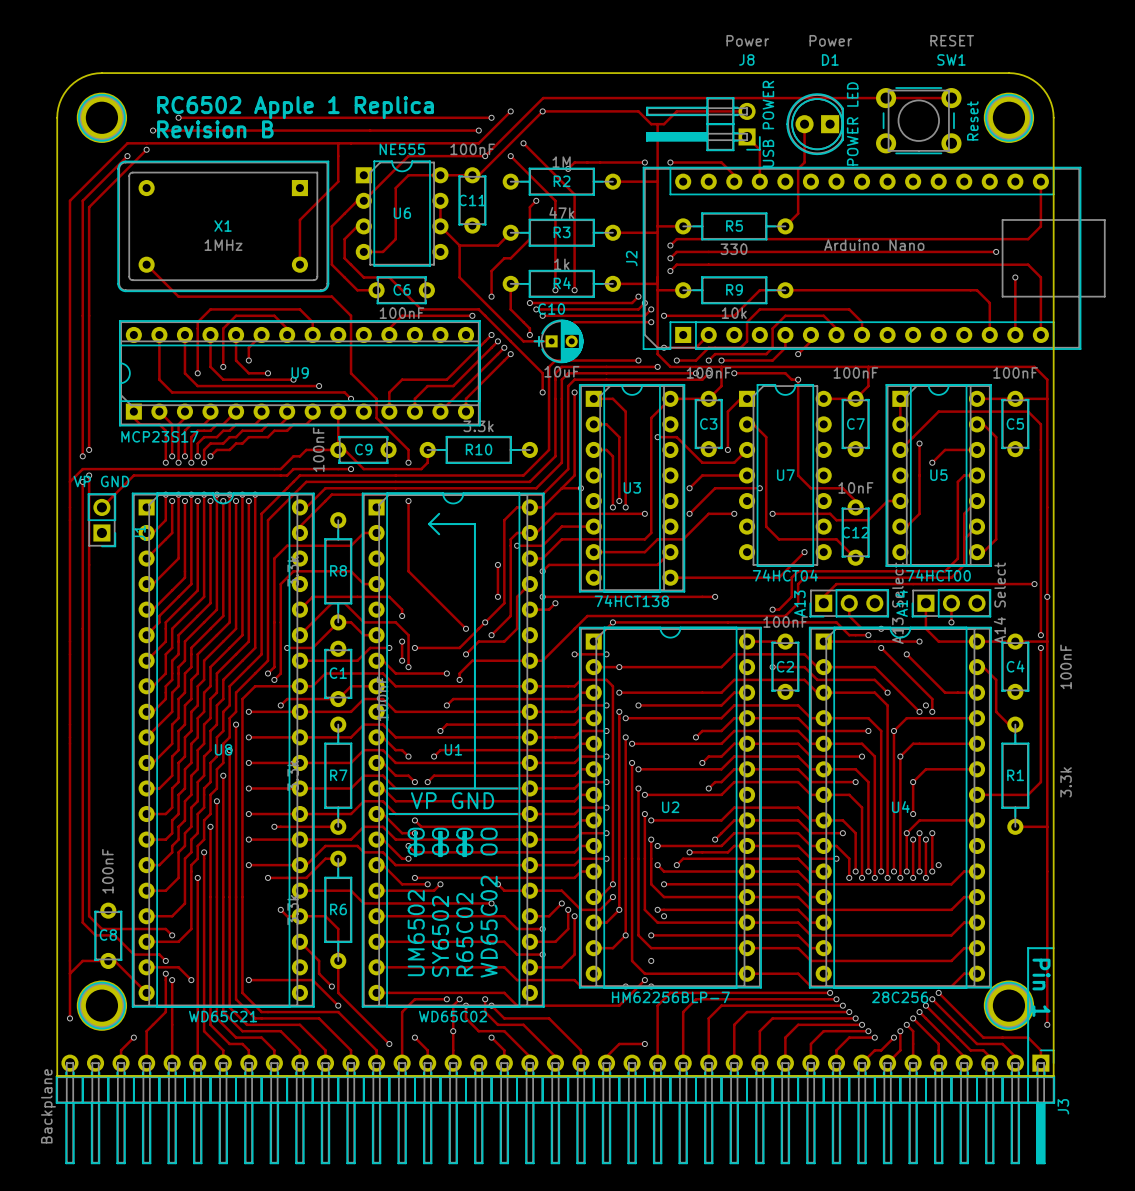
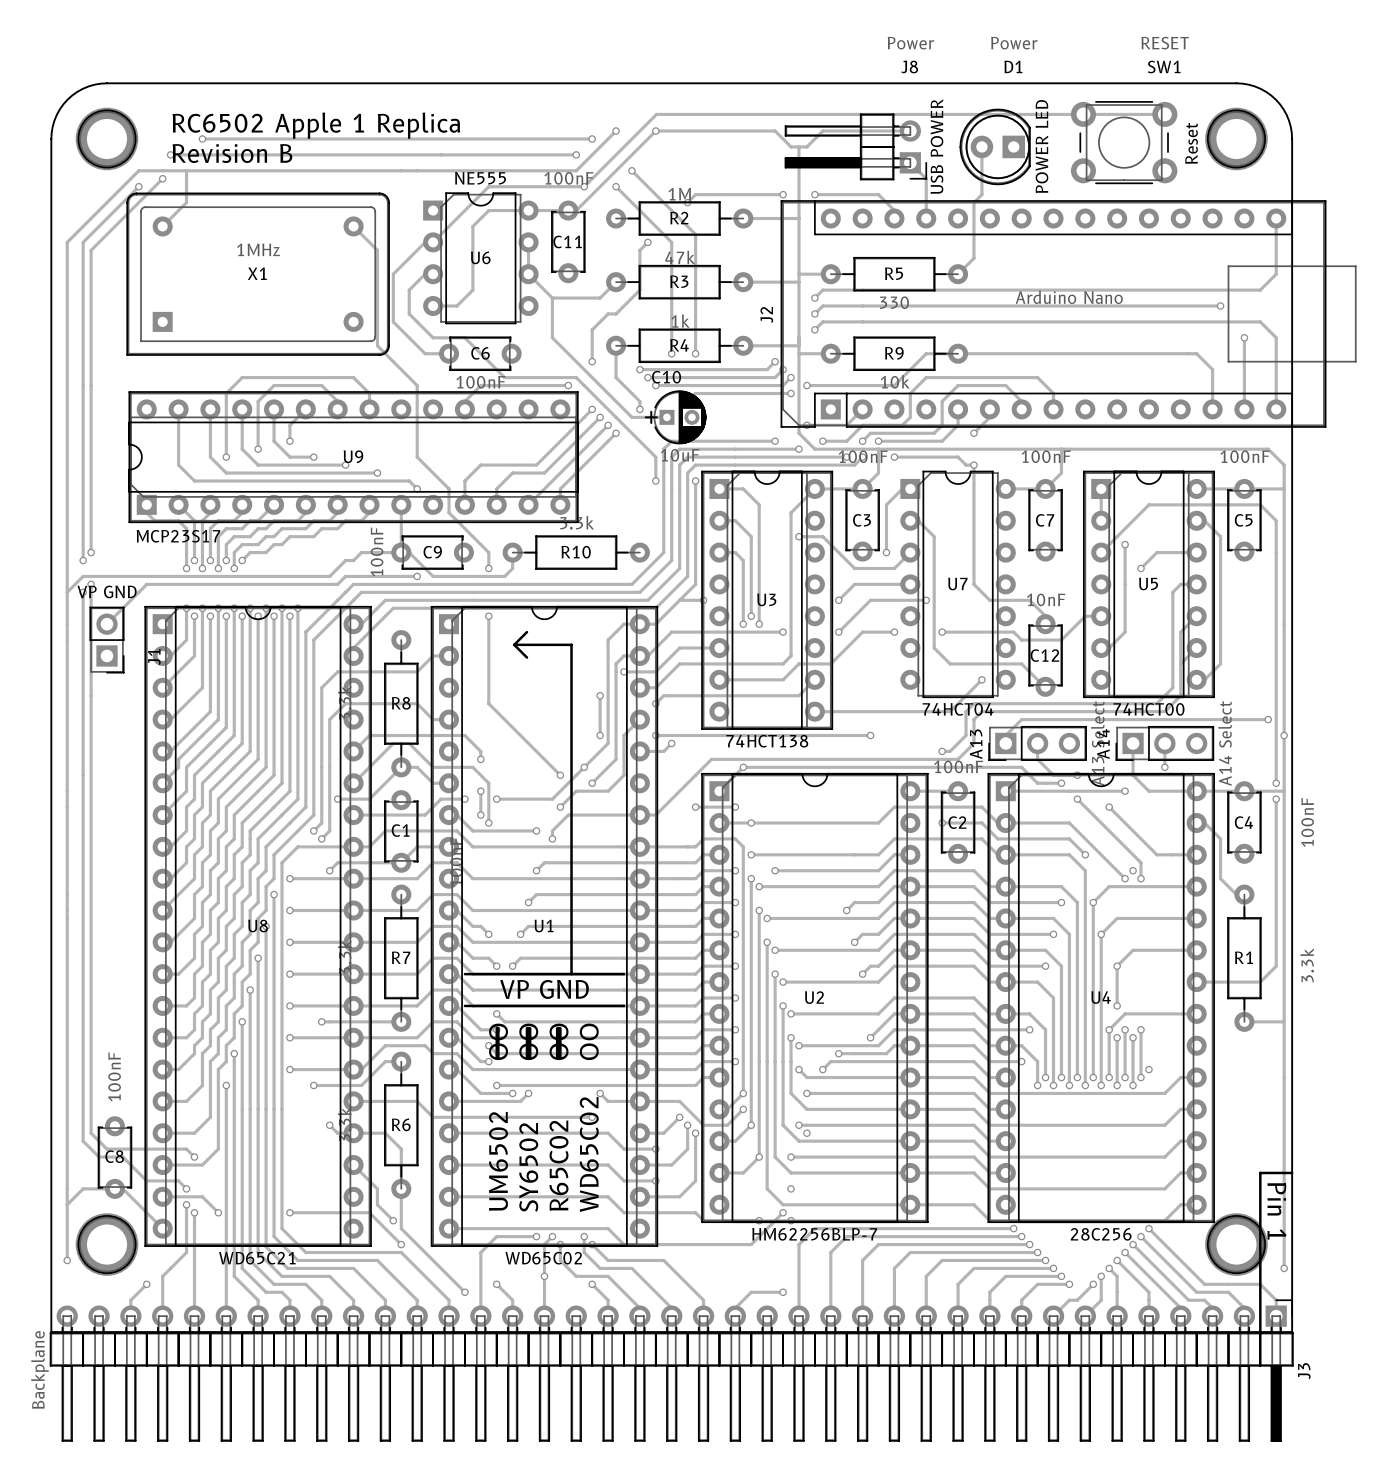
track: none -> (186, 170) (186, 202) (162, 226)
track: (338, 143) (338, 181) (299, 219) (299, 264) -> none
X1 rotation: 0° (223, 226) -> 180° (258, 274)
track: (146, 264) (178, 296) (331, 296) -> (353, 226) (377, 250) (377, 345) (393, 361)

